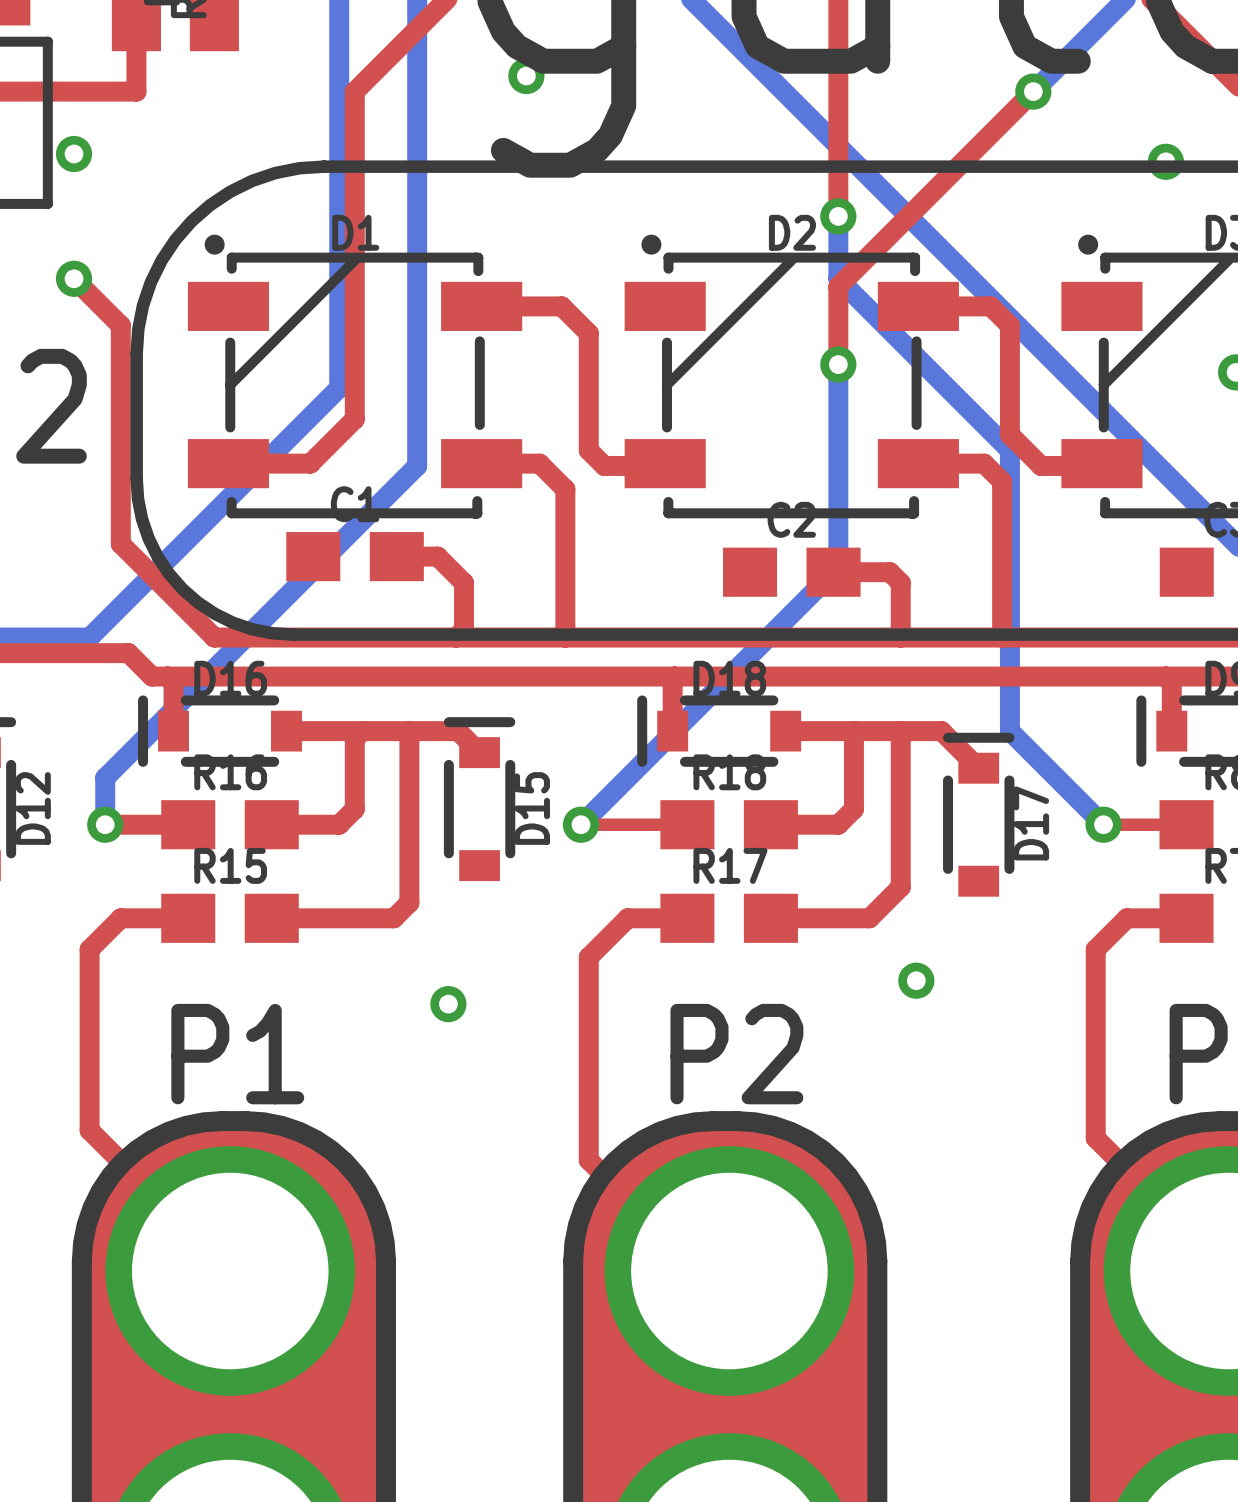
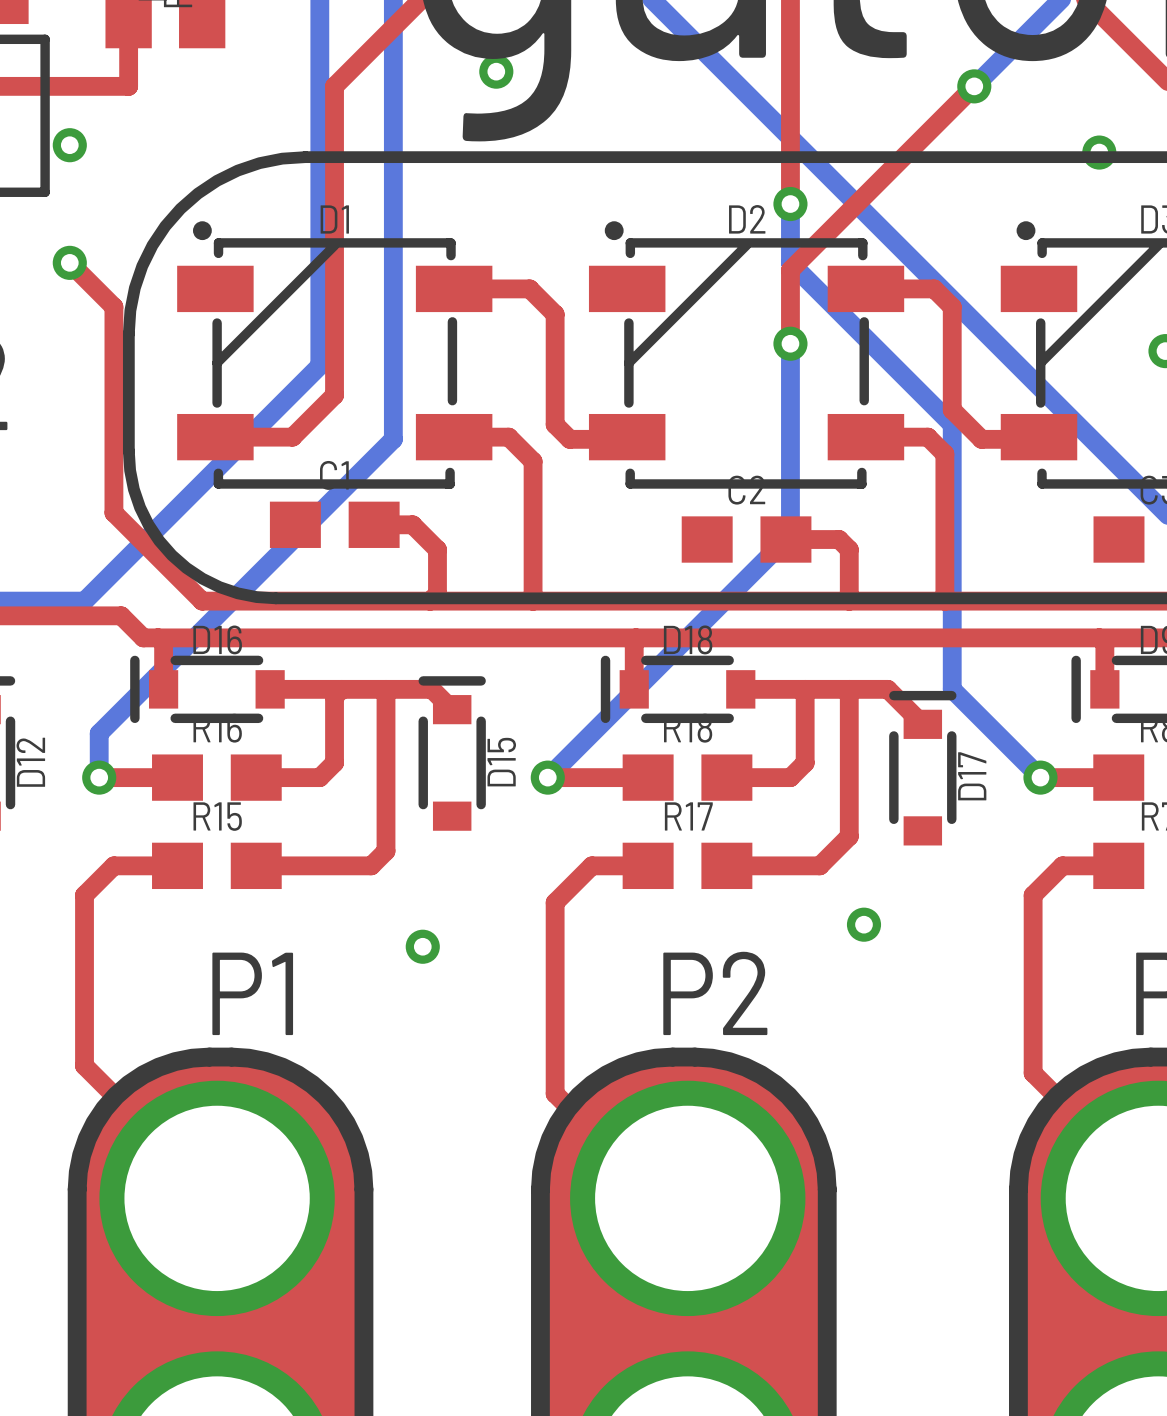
top track width: thin (580, 824) (687, 824) -> thick (547, 777) (648, 777)
top track width: thin (1103, 824) (1186, 824) -> thick (1040, 777) (1118, 777)

